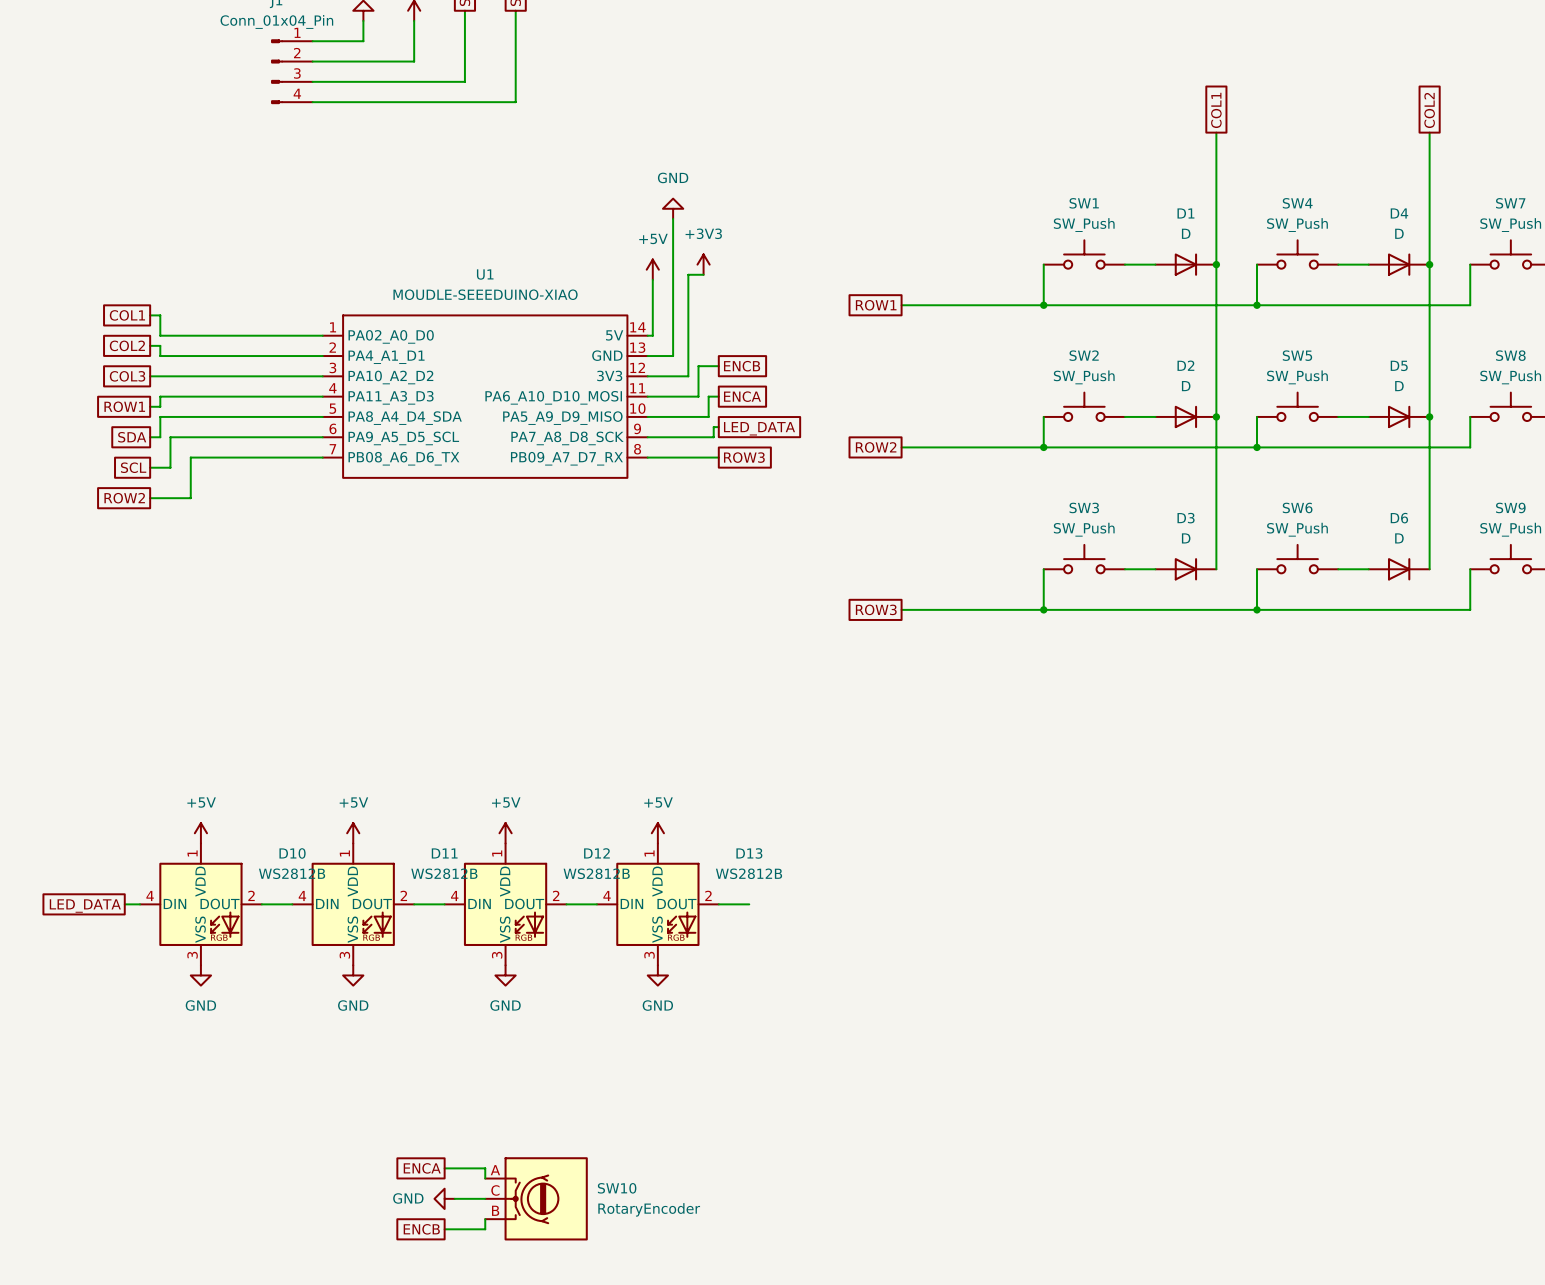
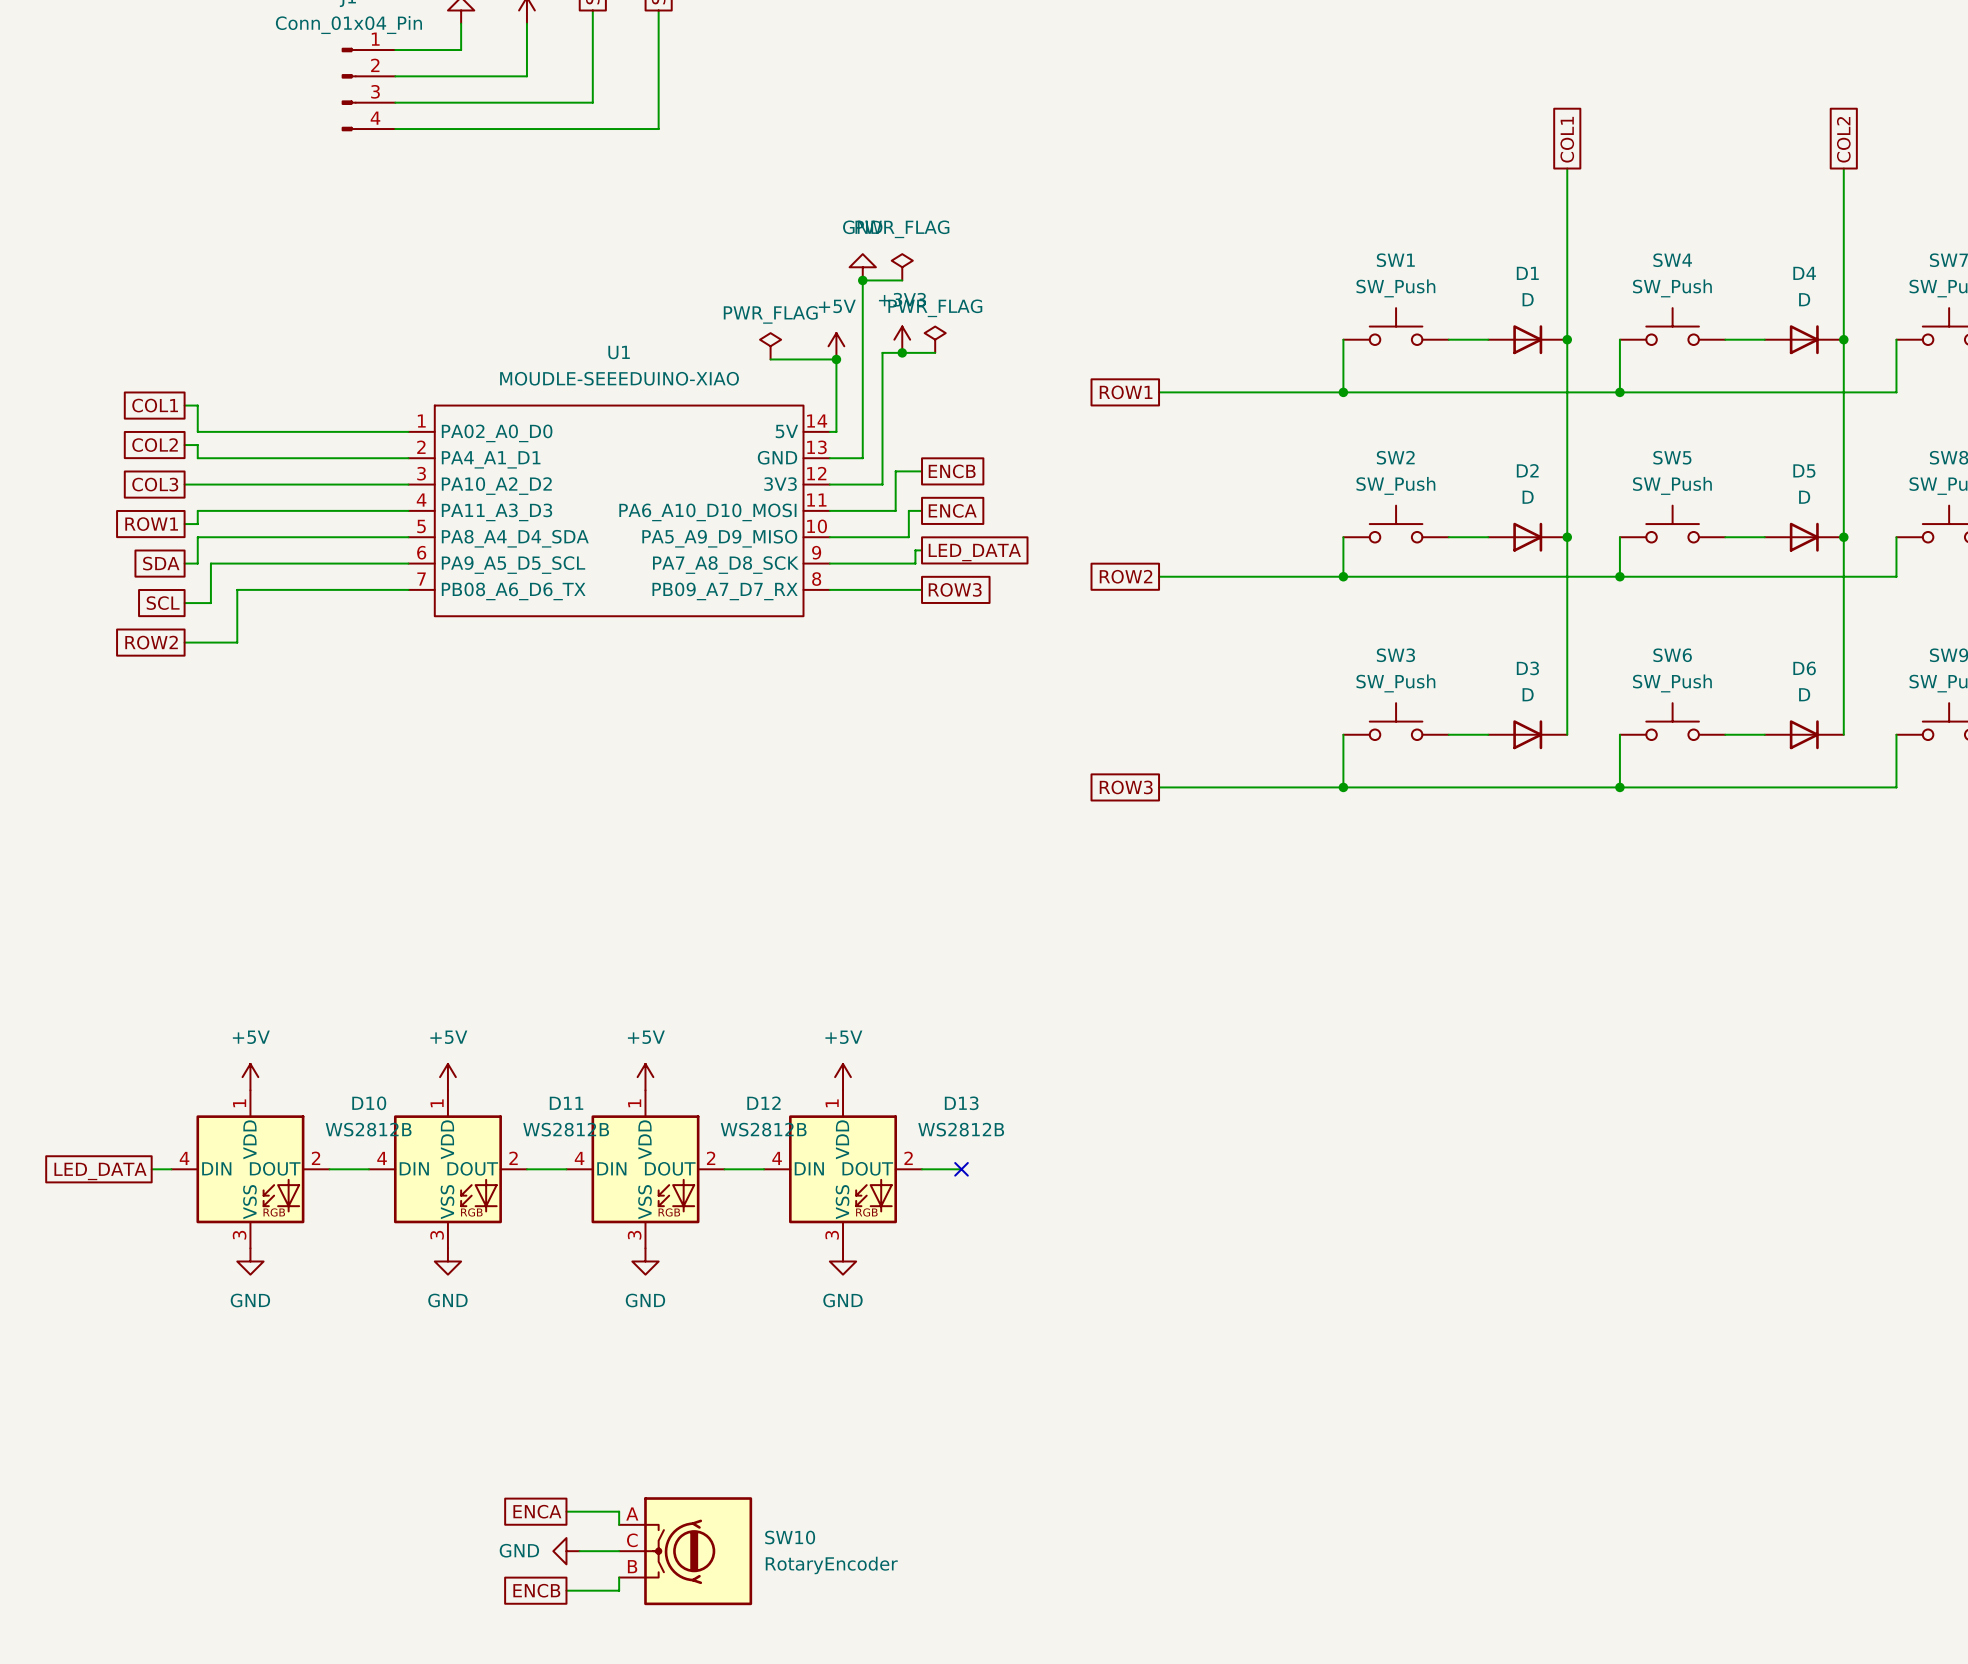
power symbol: none -> PWR_FLAG (902, 267)
wire: none -> (862, 280) (902, 280)
junction: none -> (862, 280)
power symbol: none -> PWR_FLAG (935, 339)
power symbol: none -> PWR_FLAG (770, 346)
wire: none -> (902, 352) (935, 352)
junction: none -> (902, 352)
wire: none -> (770, 359) (836, 359)
junction: none -> (836, 359)
no-connect mark: none -> (961, 1169)

